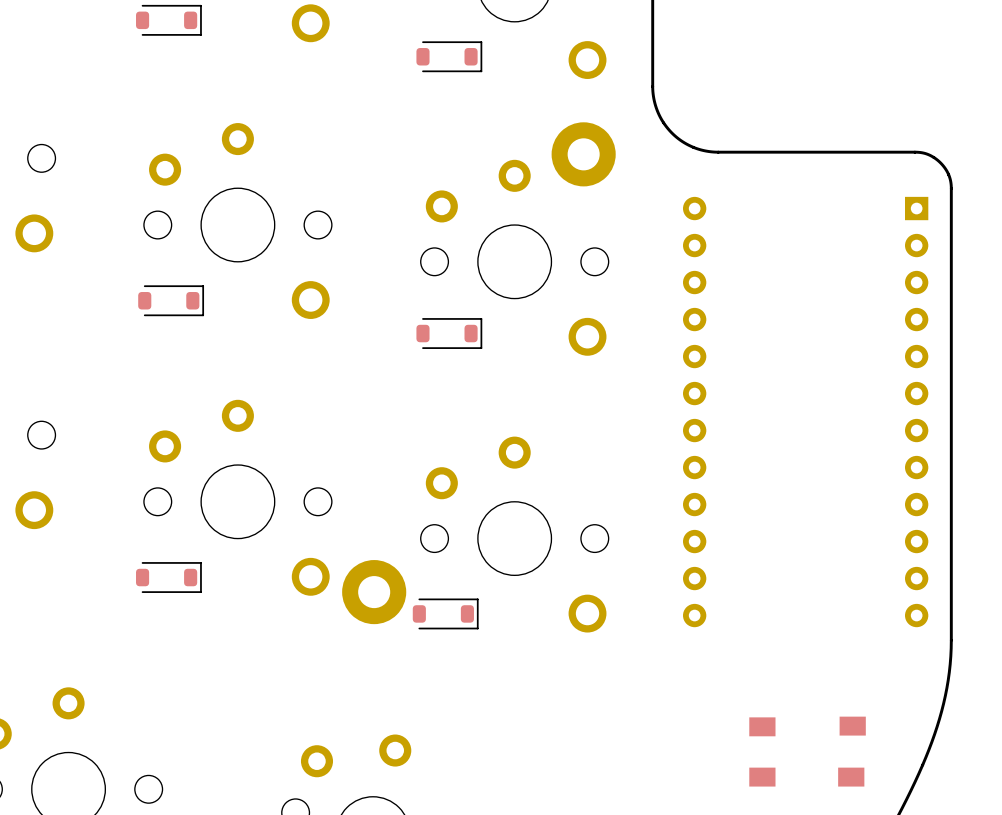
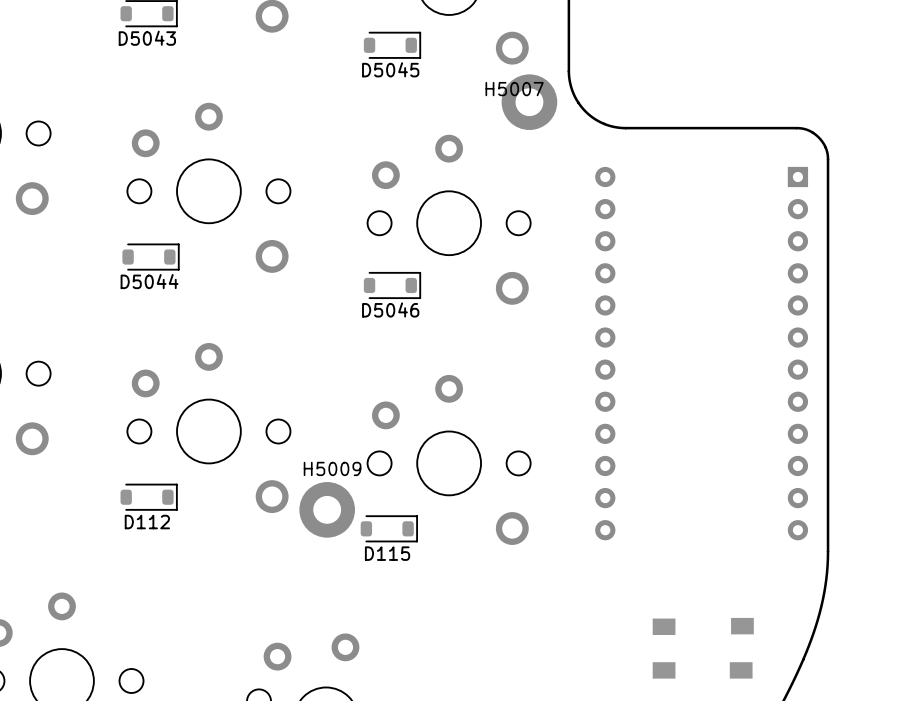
D5043 name: none -> D5043 (147, 38)
D5045 name: none -> D5045 (390, 69)
H5007: none -> (529, 102)
part: (583, 154) -> none
D5044 name: none -> D5044 (149, 281)
D5046 name: none -> D5046 (390, 309)
H5009 name: none -> H5009 (332, 468)
D112 name: none -> D112 (147, 522)
D115 name: none -> D115 (387, 553)

